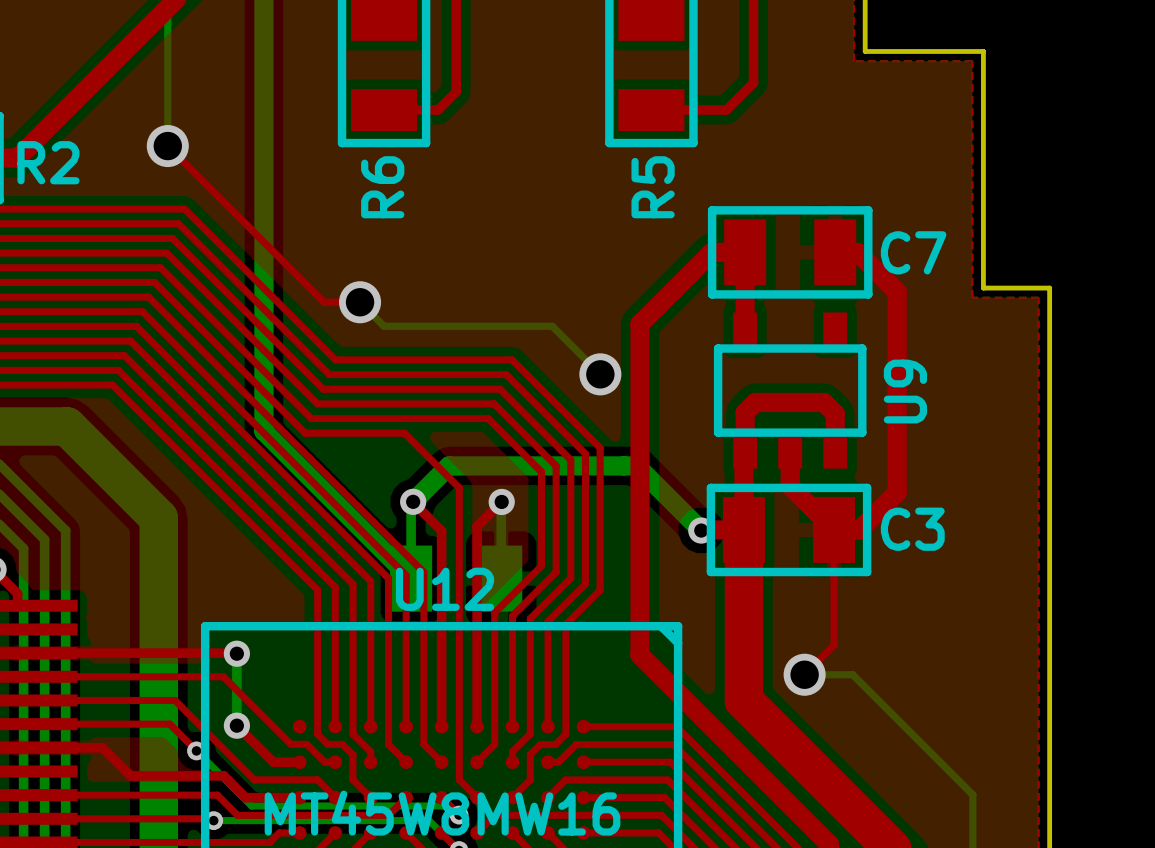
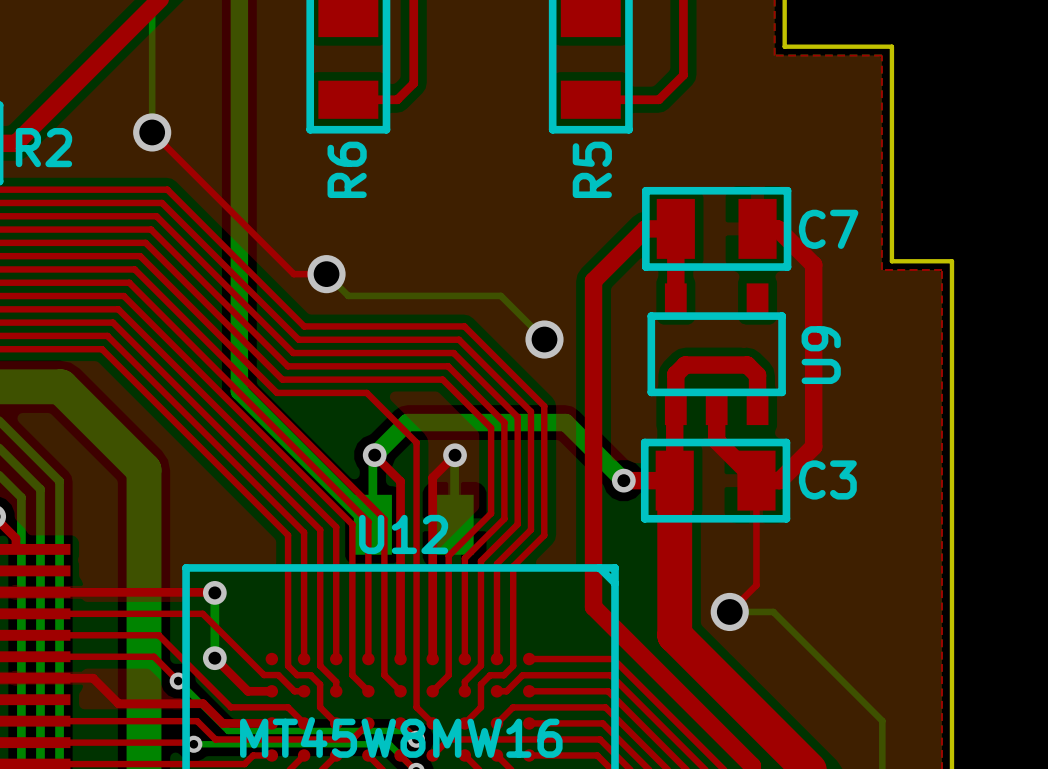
top track: (654, 309) (640, 324) (640, 655) (654, 669) -> (593, 280) (593, 607)
bottom track: (623, 465) (636, 465) (701, 530) -> (565, 422) (623, 480)
via position: (701, 530) -> (623, 480)

